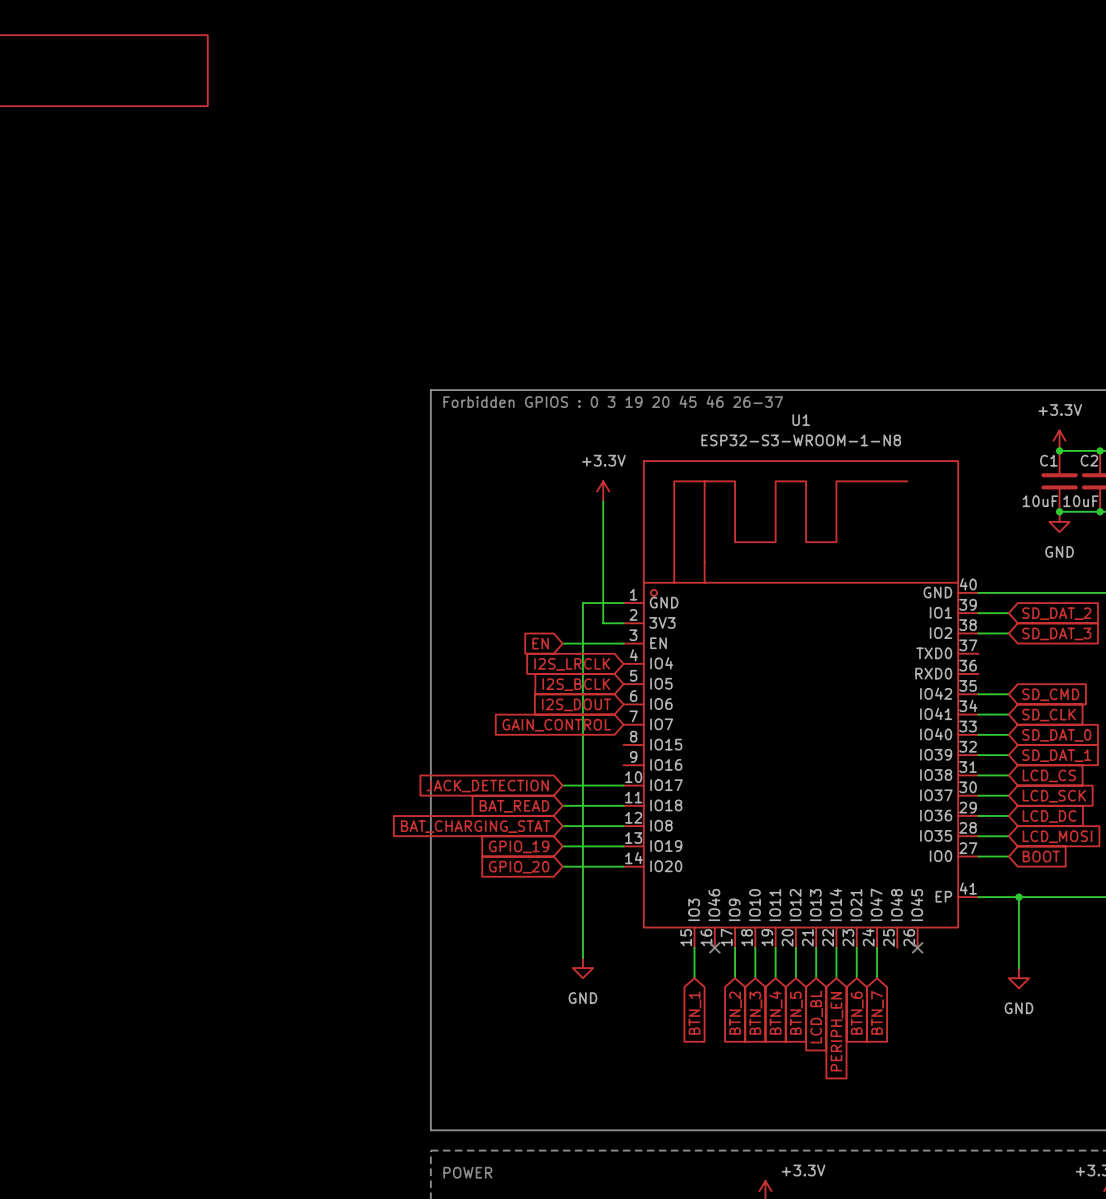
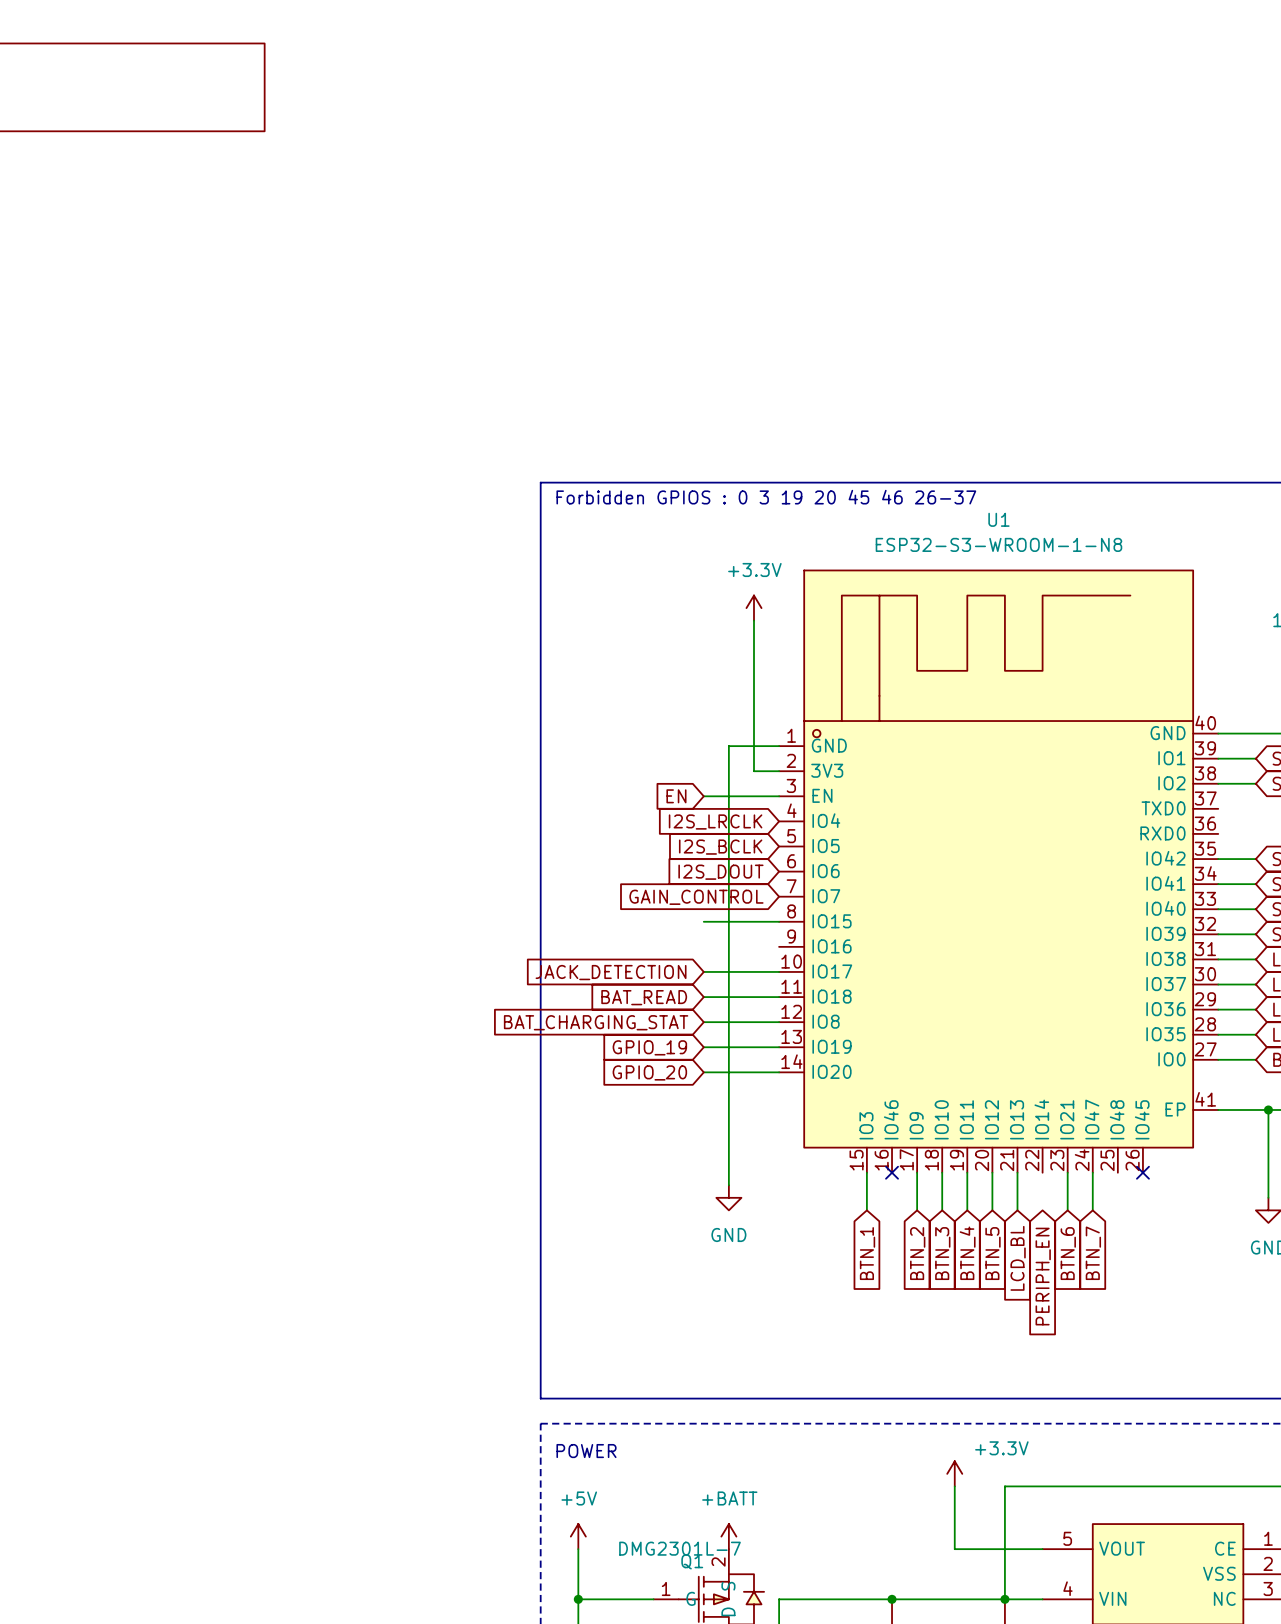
wire: none -> (703, 921) (779, 921)
wire: (836, 947) (836, 978) -> none

